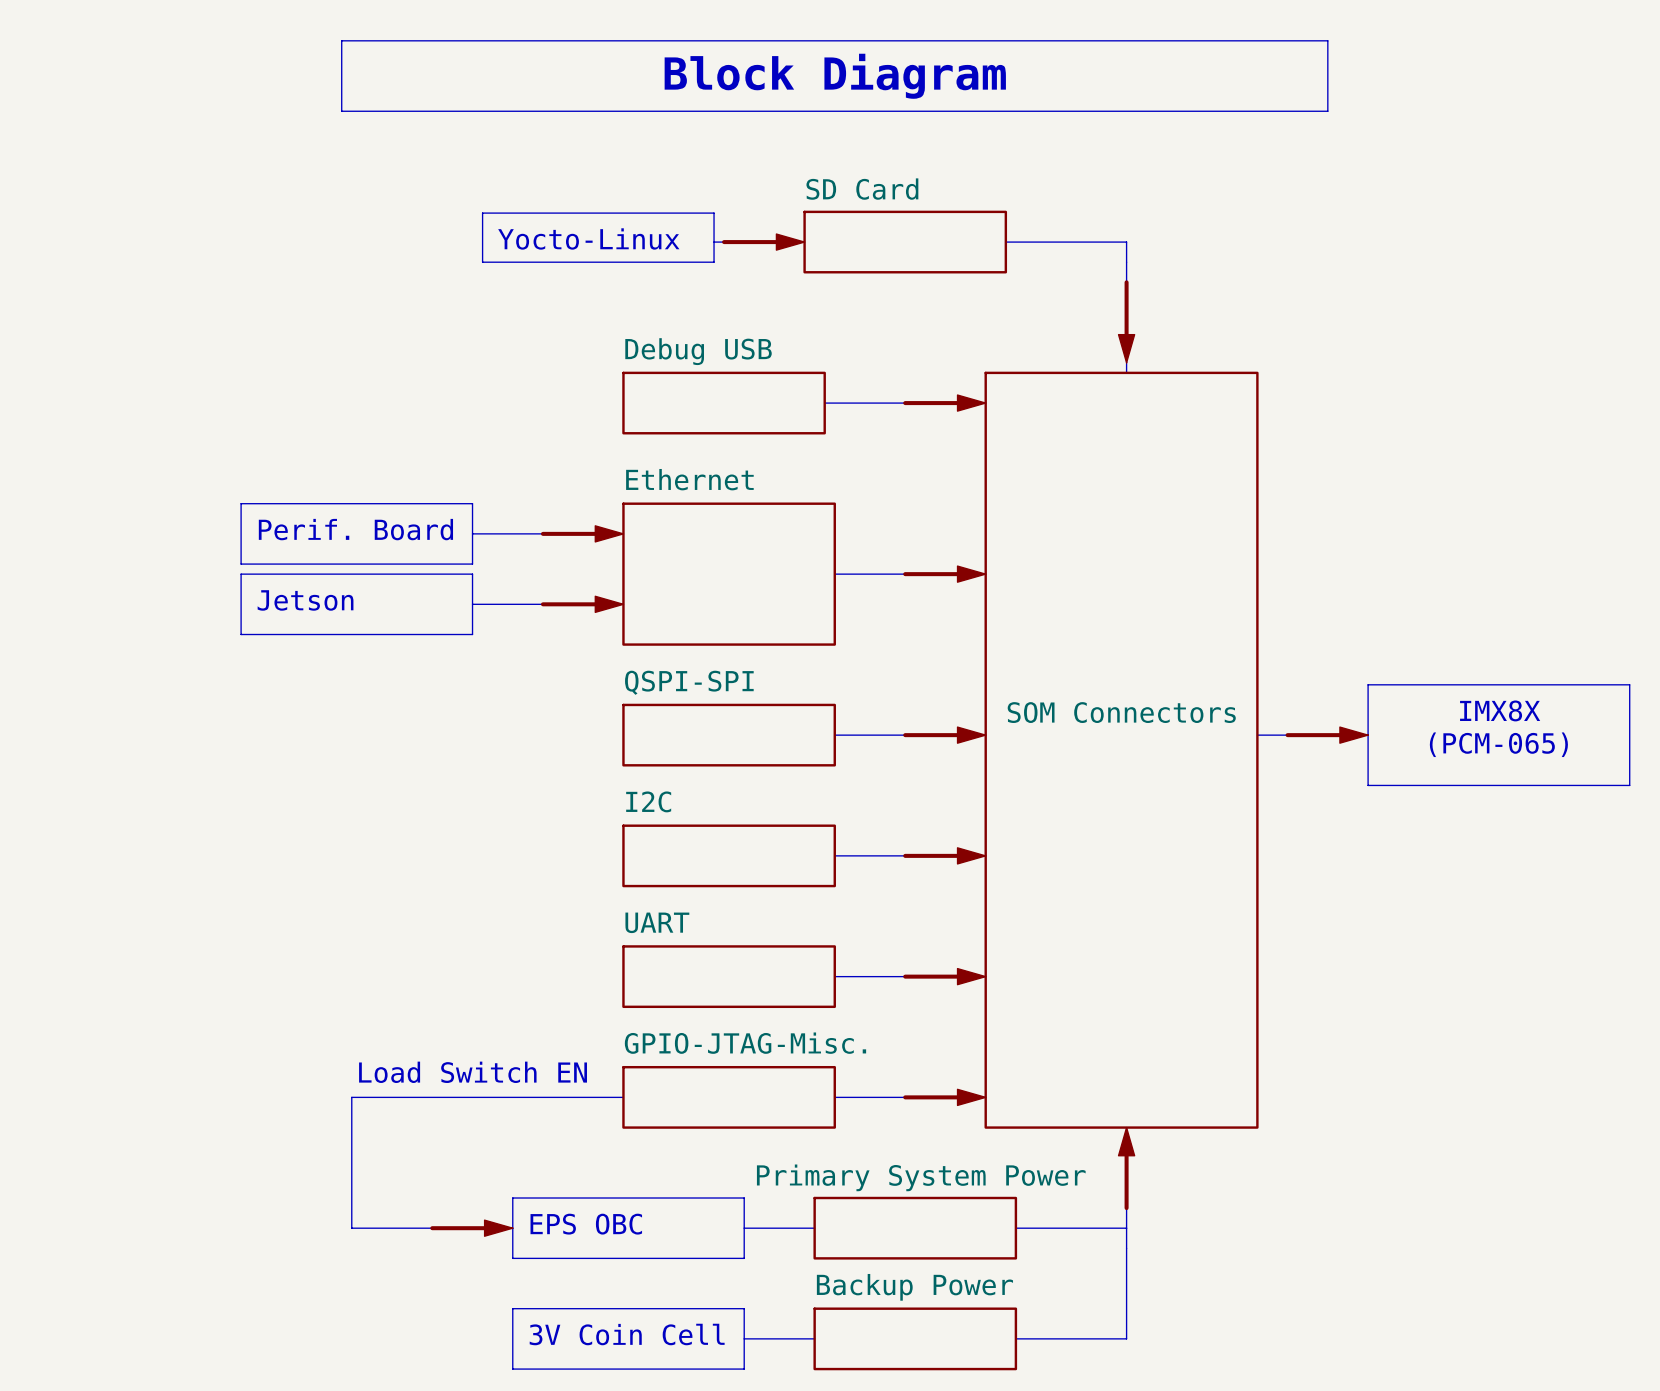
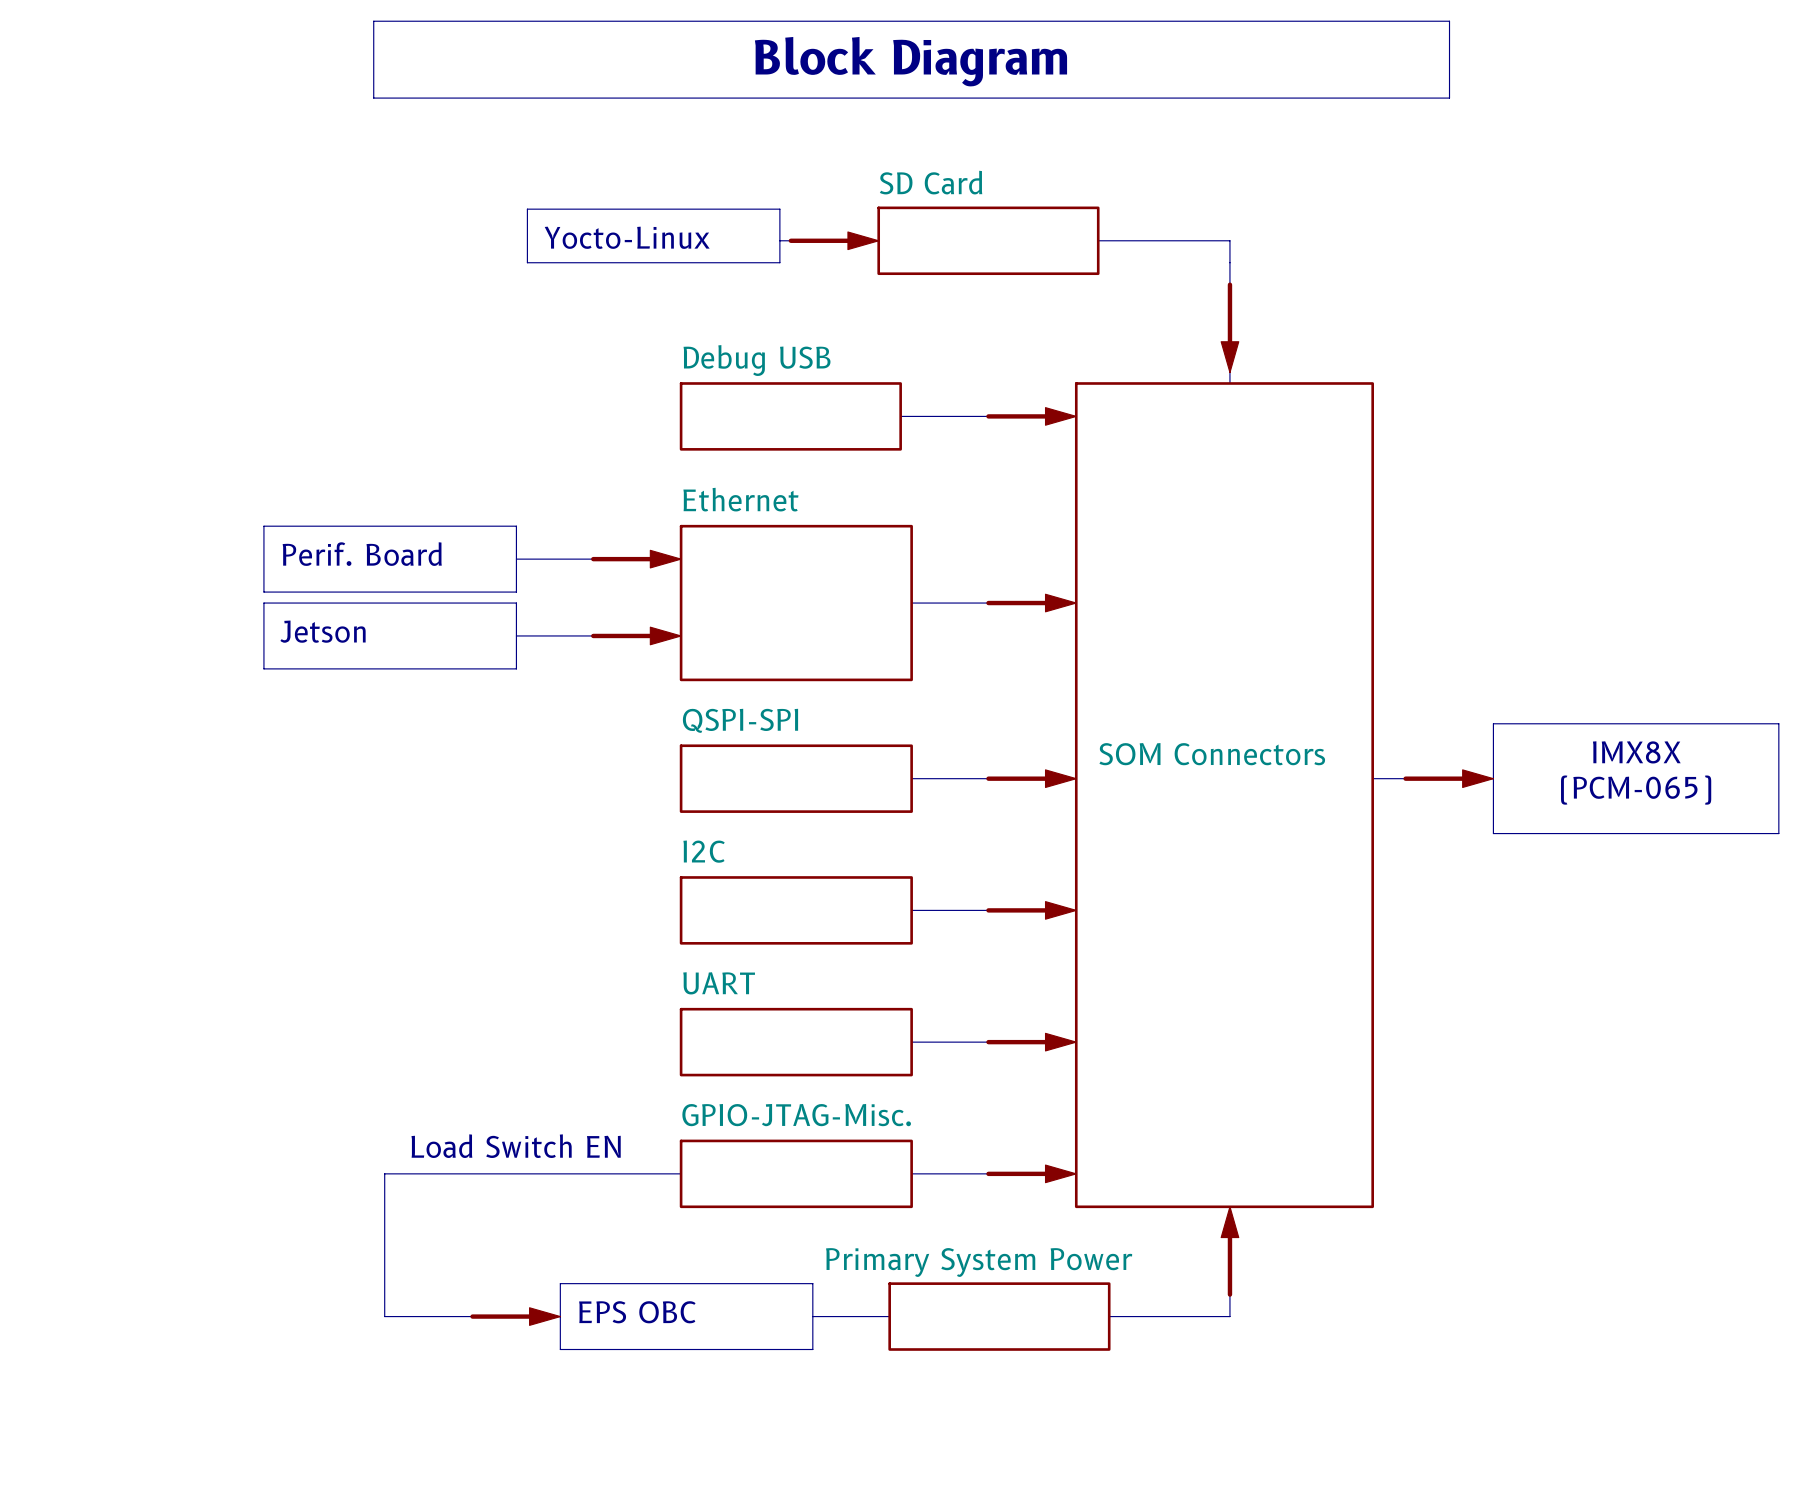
line: (1126, 1228) (1126, 1338) (1015, 1338) -> none
line: (512, 1308) (744, 1308) (744, 1369) (512, 1369) (512, 1308) -> none
text: 3V Coin Cell (627, 1334) -> none
line: (744, 1338) (814, 1338) -> none
sheet Backup Power: (915, 1338) -> none

